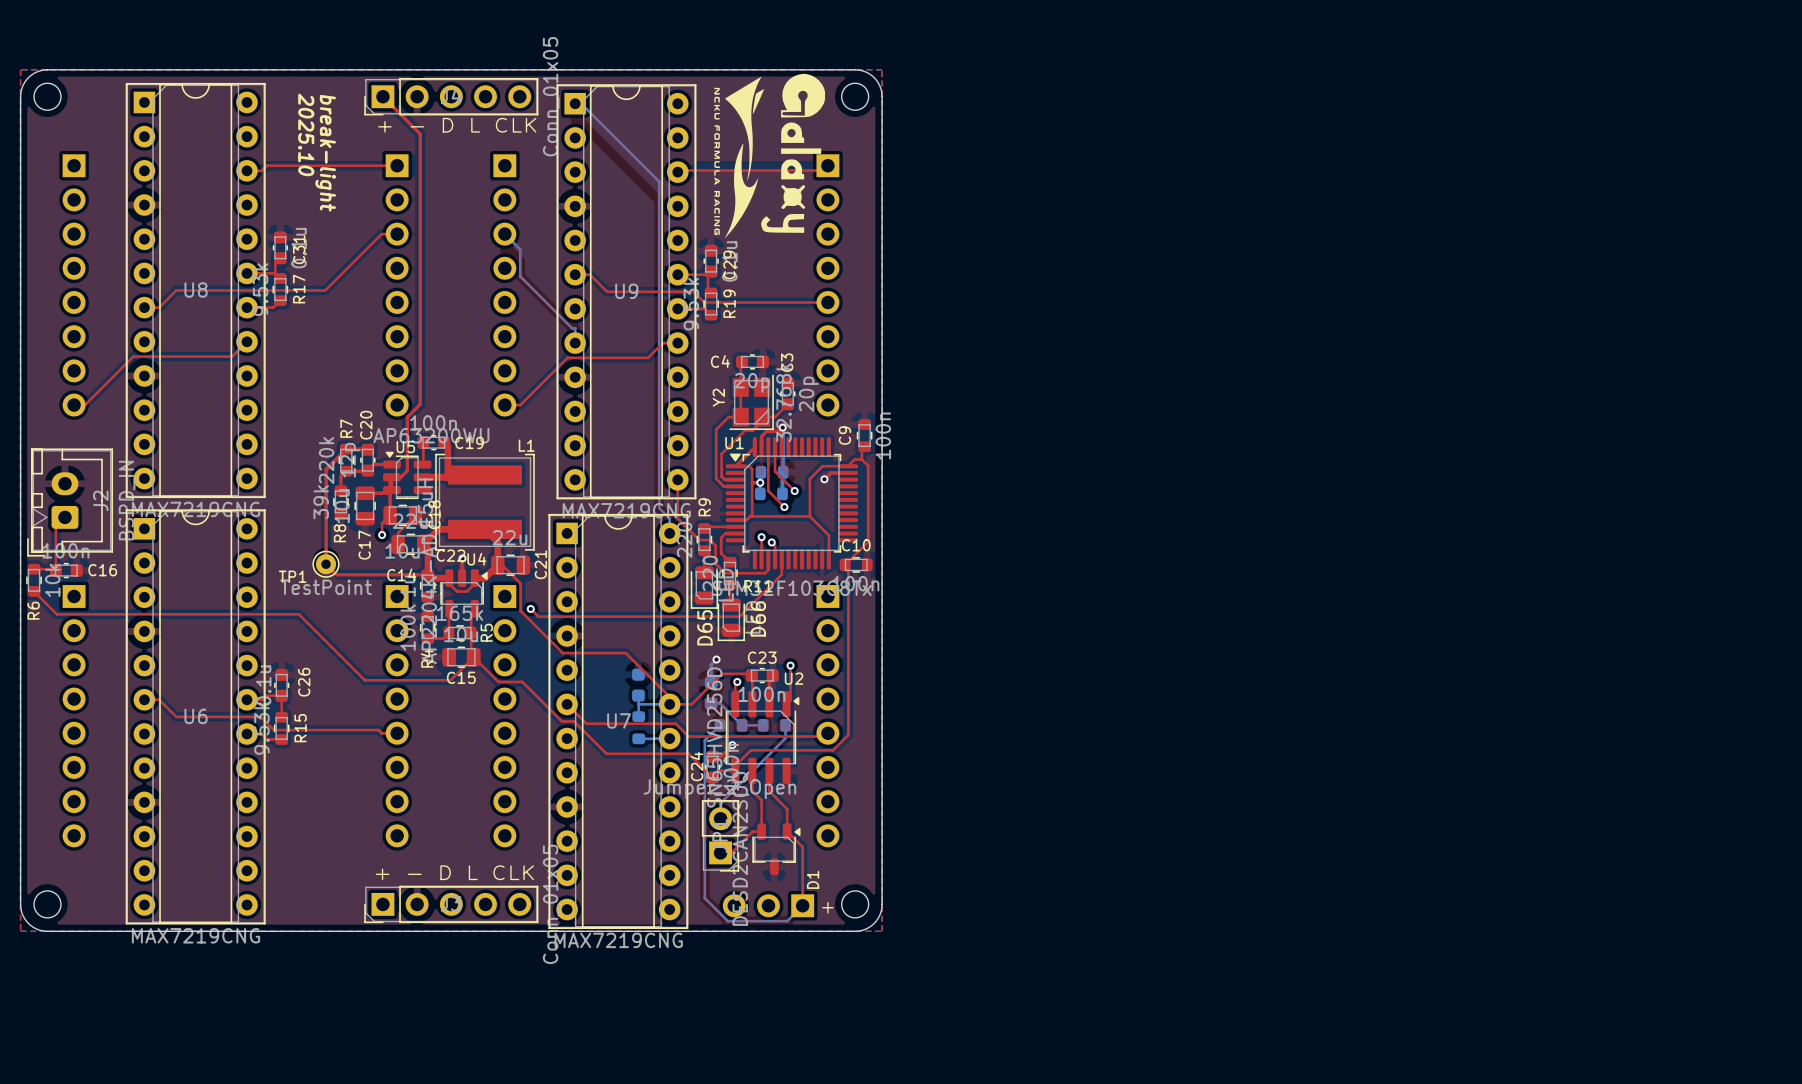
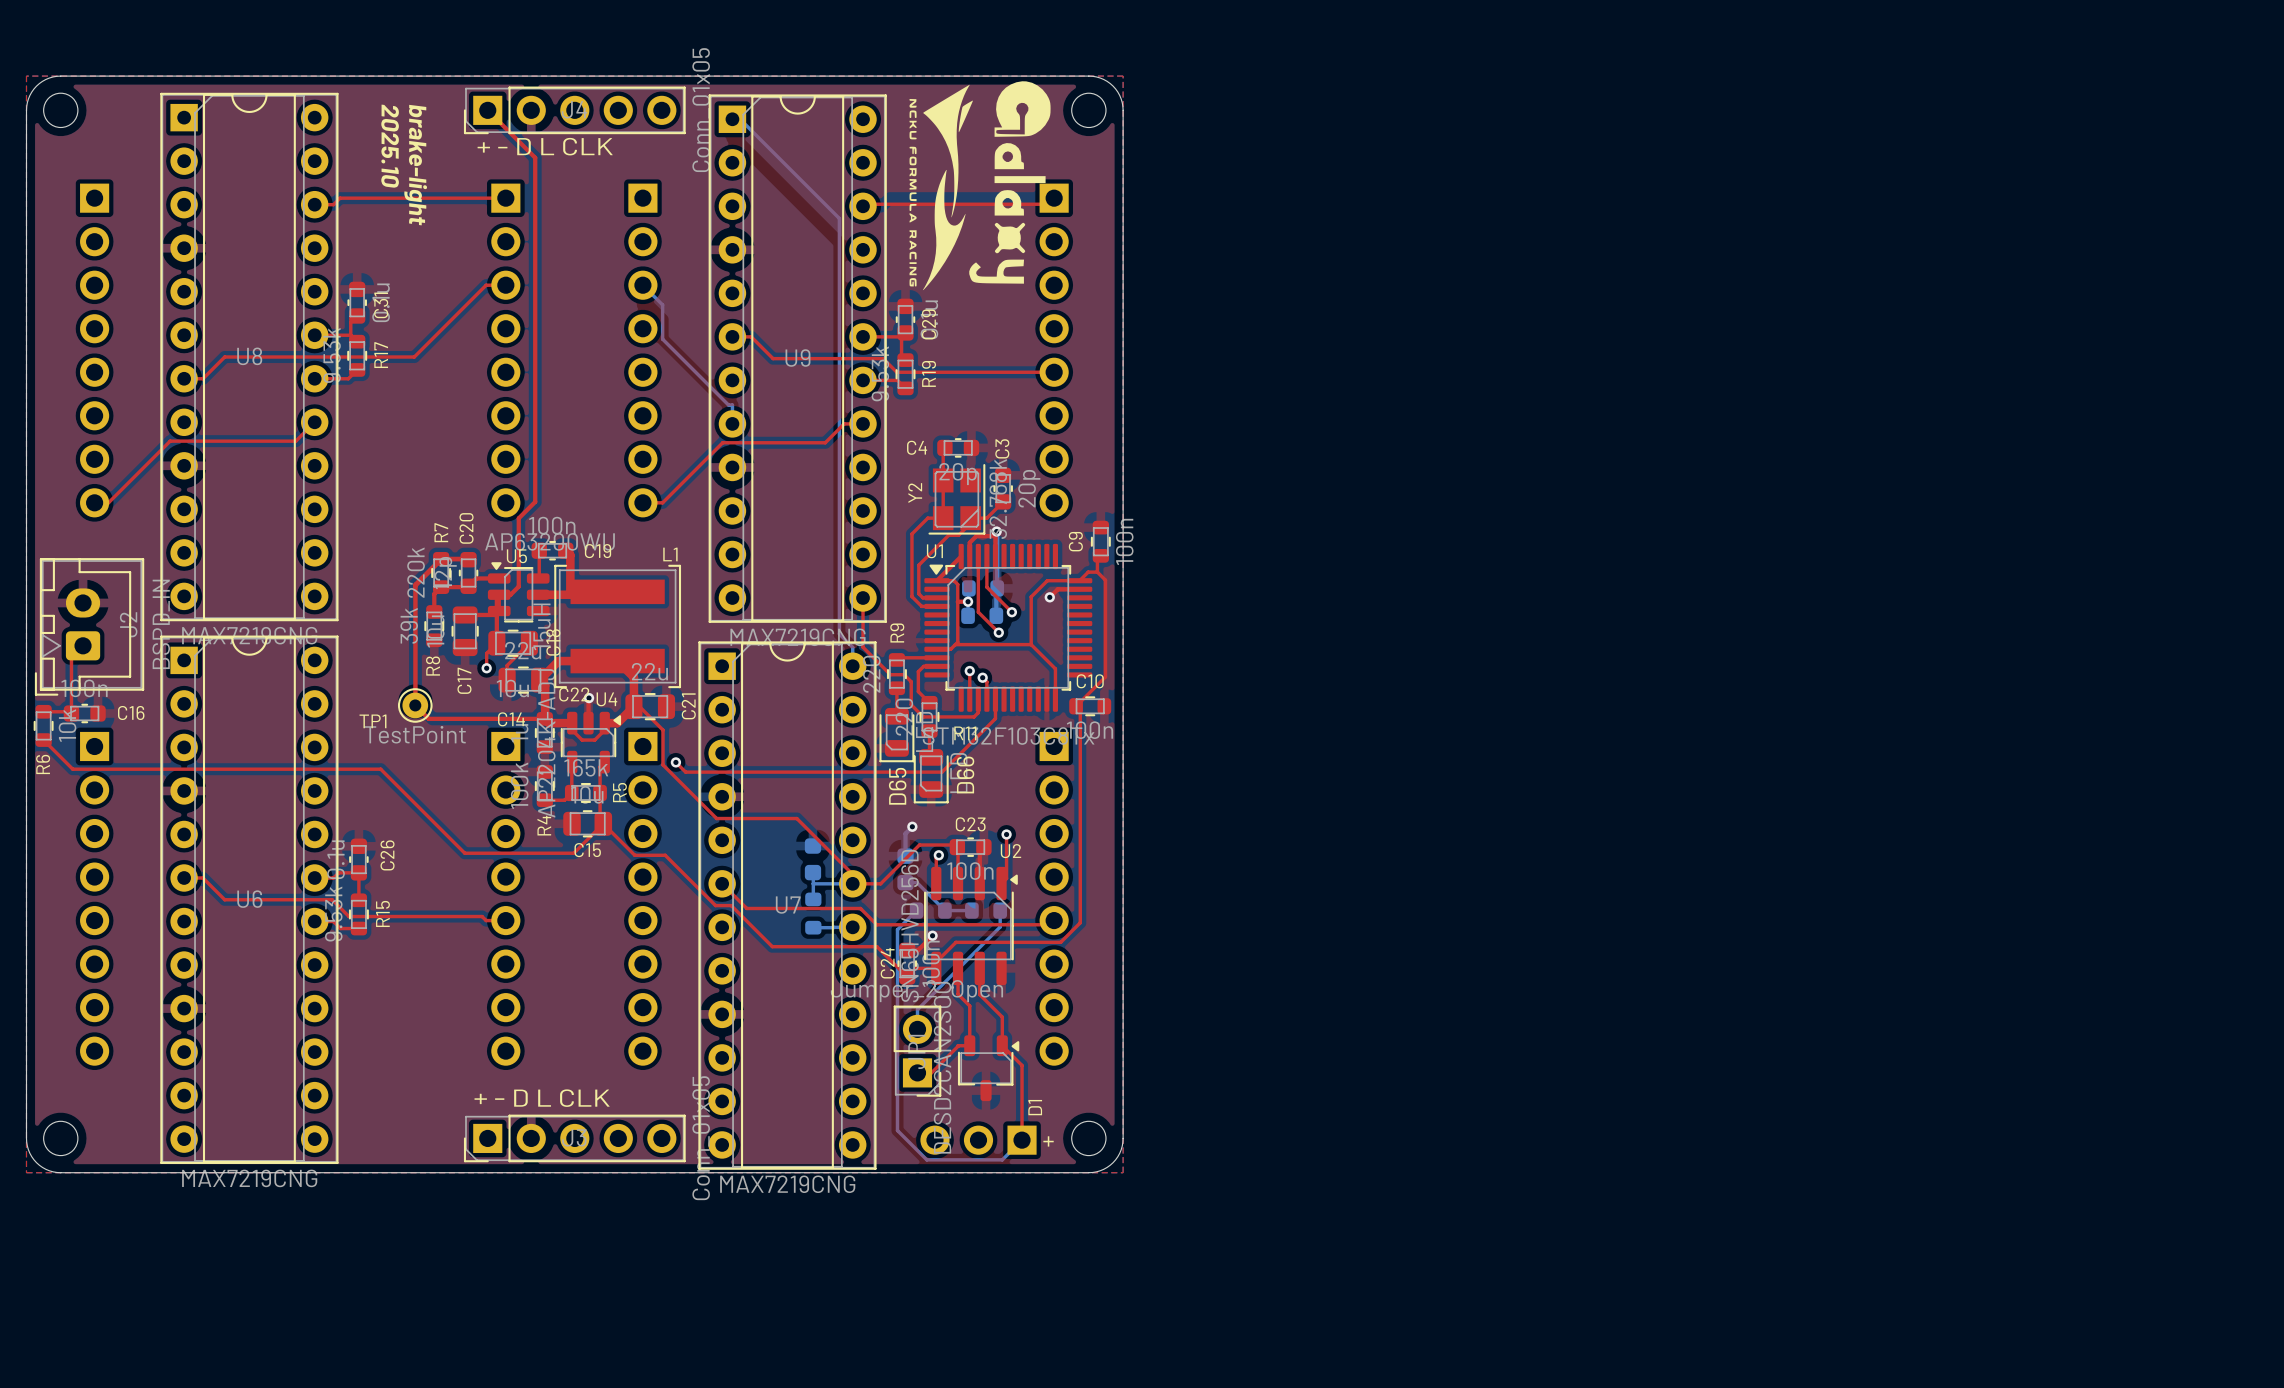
text: break-light (325, 153) -> brake-light (415, 165)

